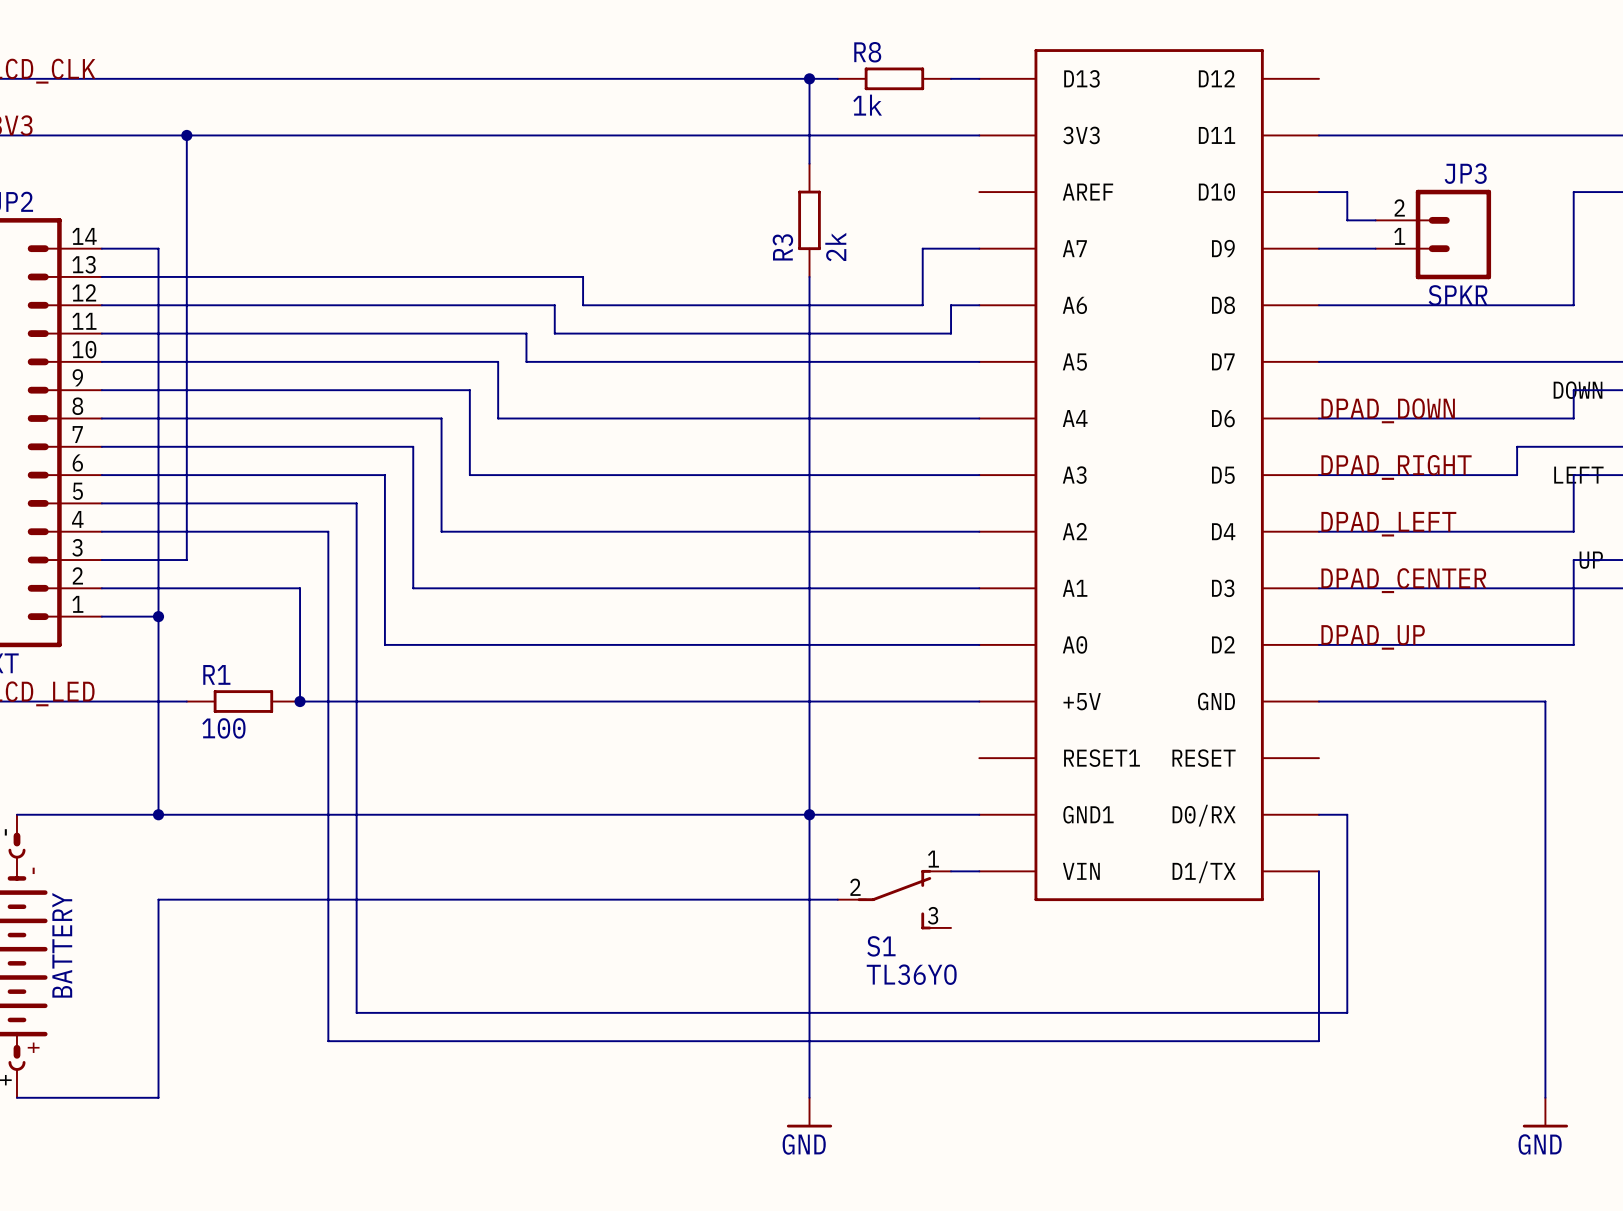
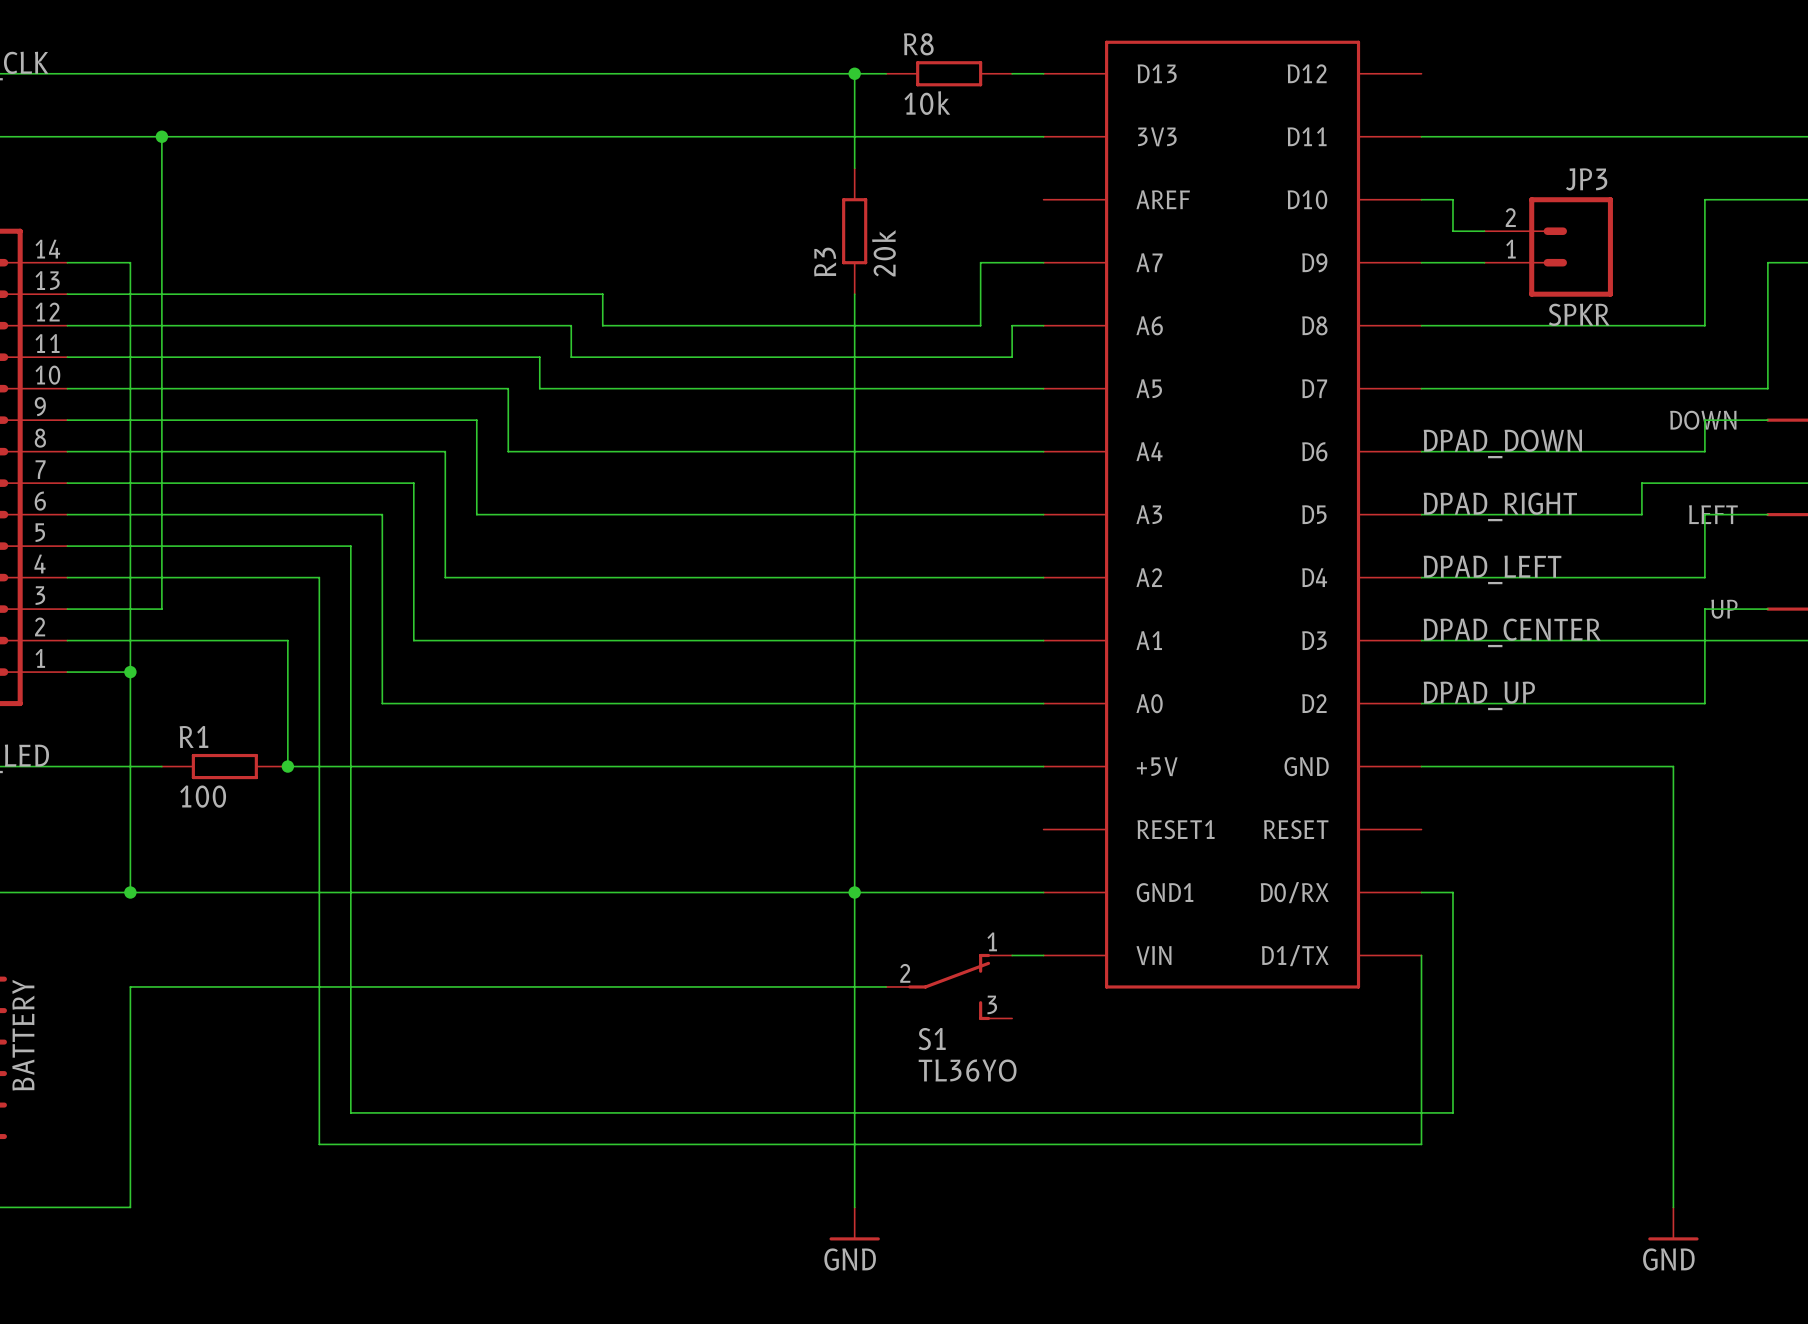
R8 value: 1k (867, 105) -> 10k (927, 103)
R3 value: 2k (835, 246) -> 20k (883, 253)

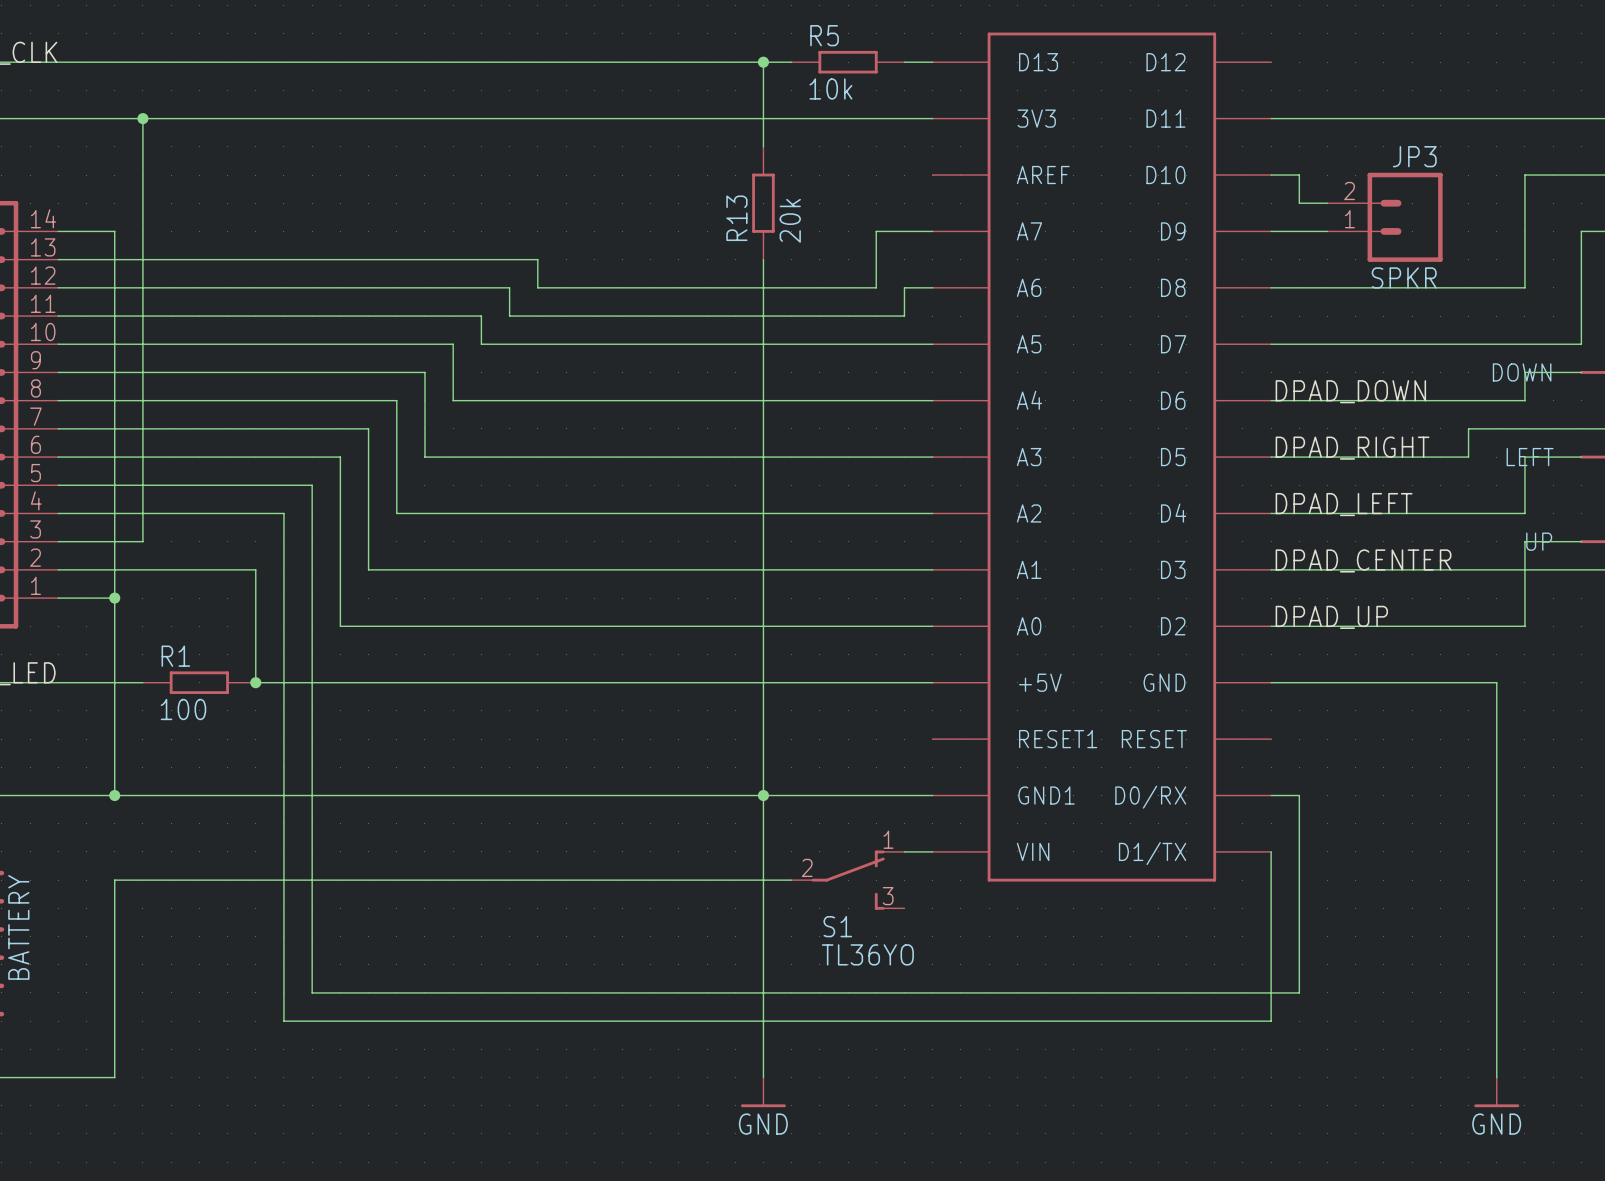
R8 name: R8 (918, 44) -> R5 (824, 35)
R3 name: R3 (825, 262) -> R13 (736, 218)

